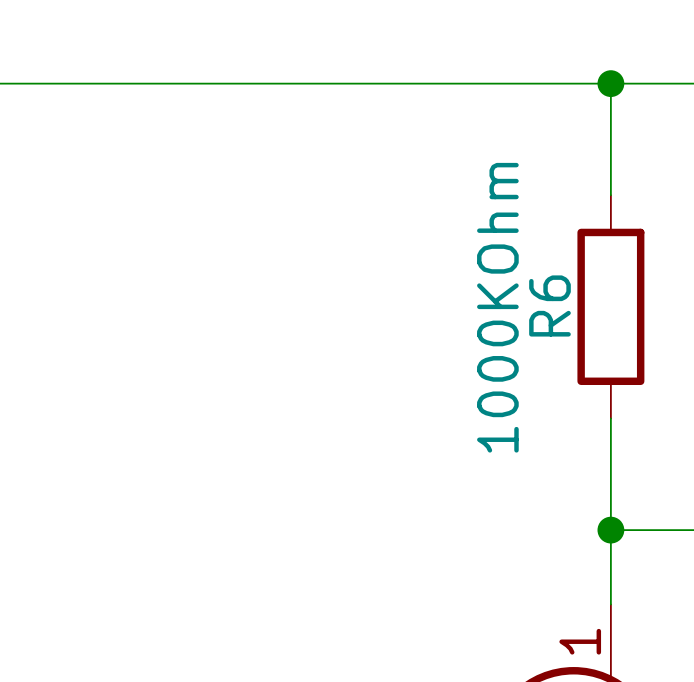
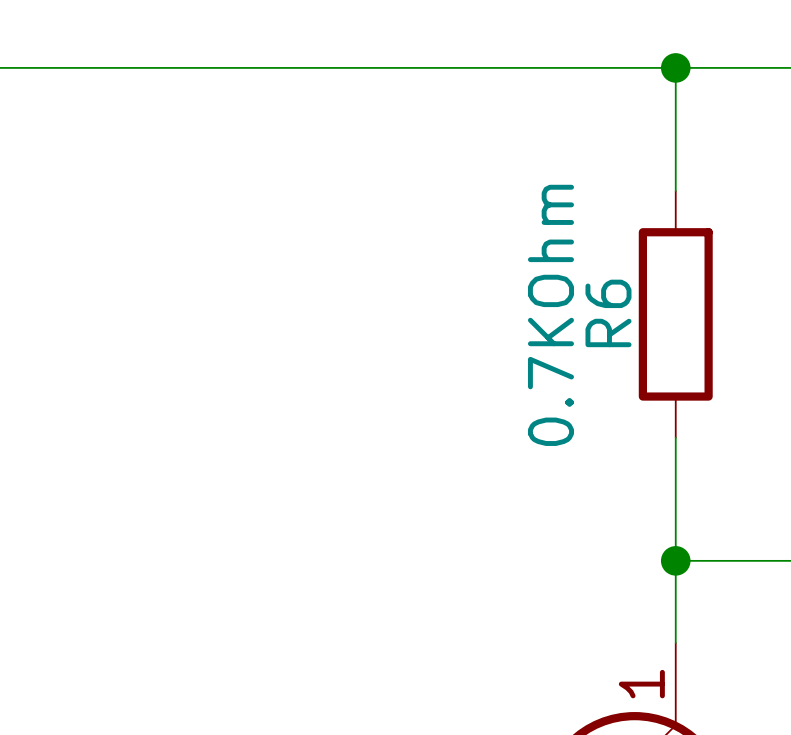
R6 value: 1000KOhm (497, 307) -> 0.7KOhm (550, 315)

